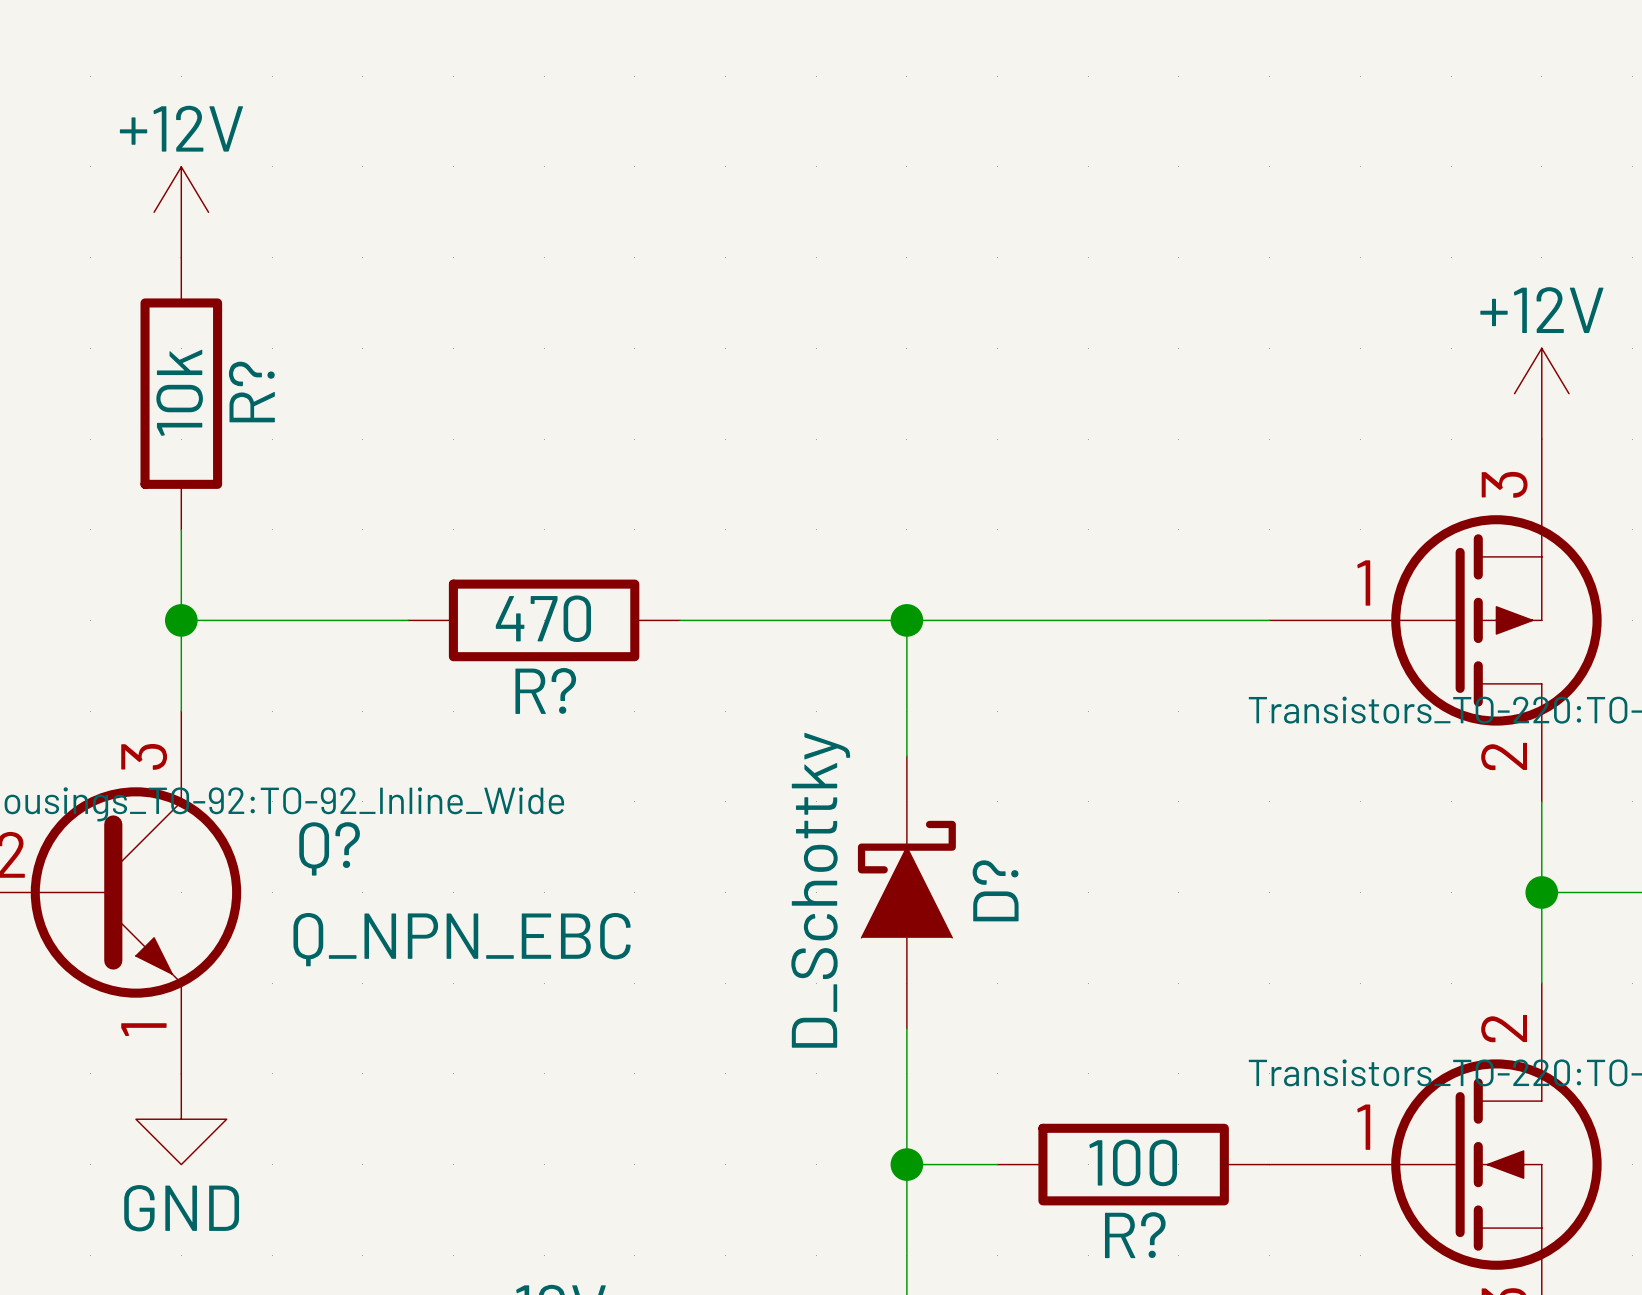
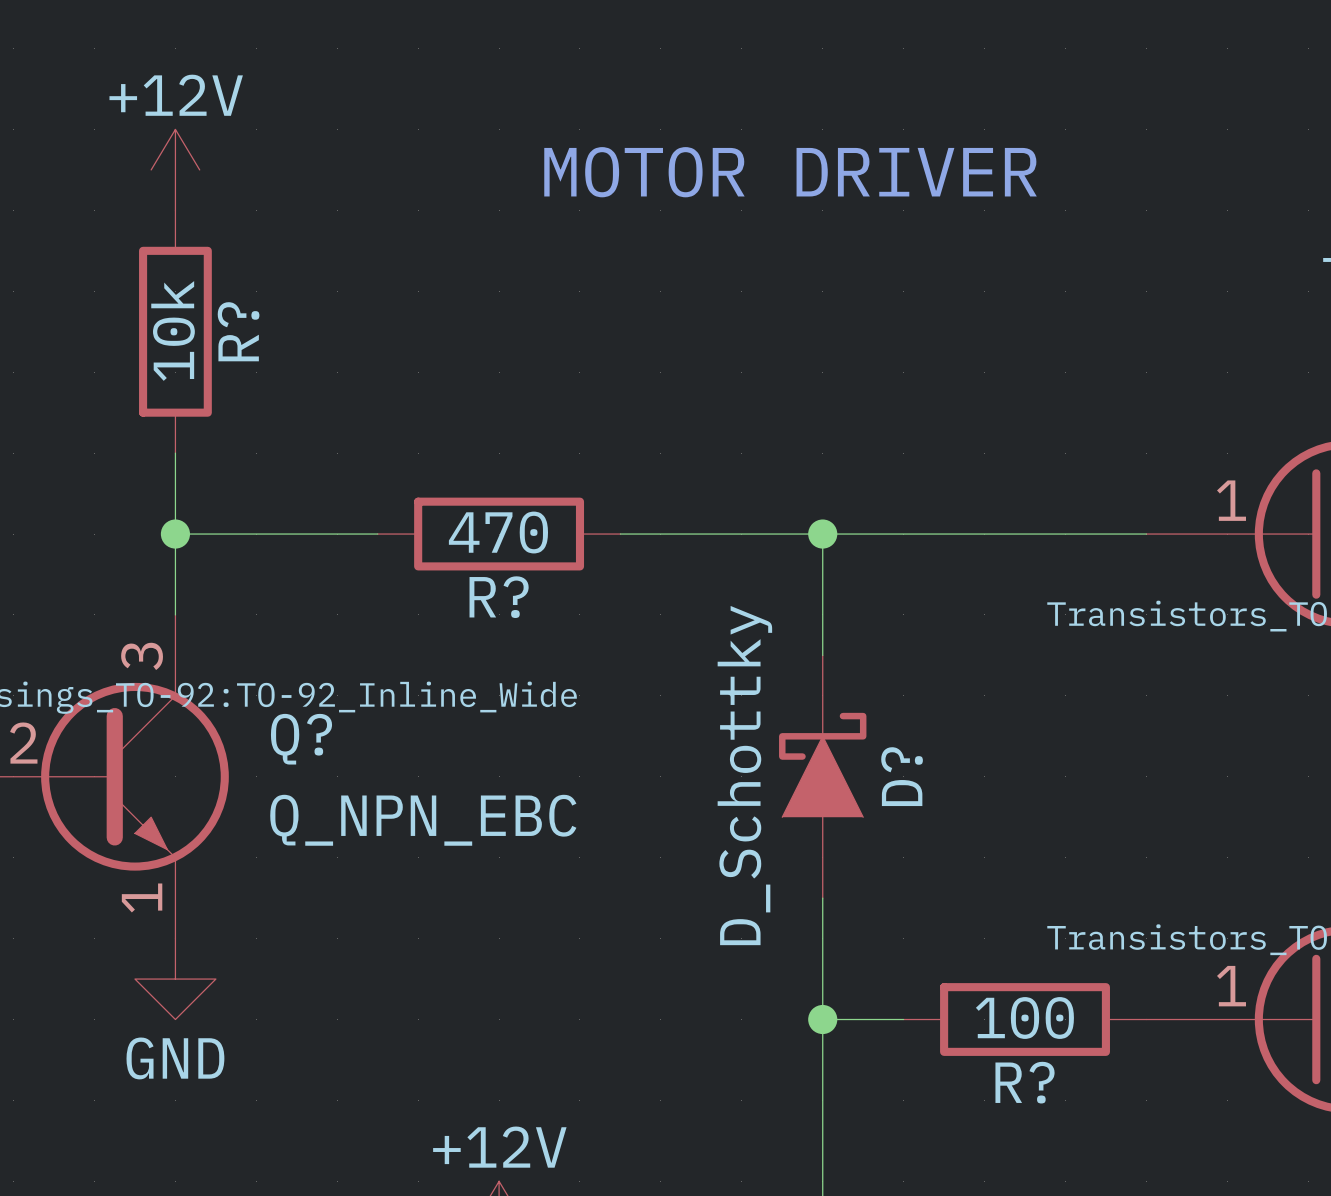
text: none -> MOTOR DRIVER (790, 172)

